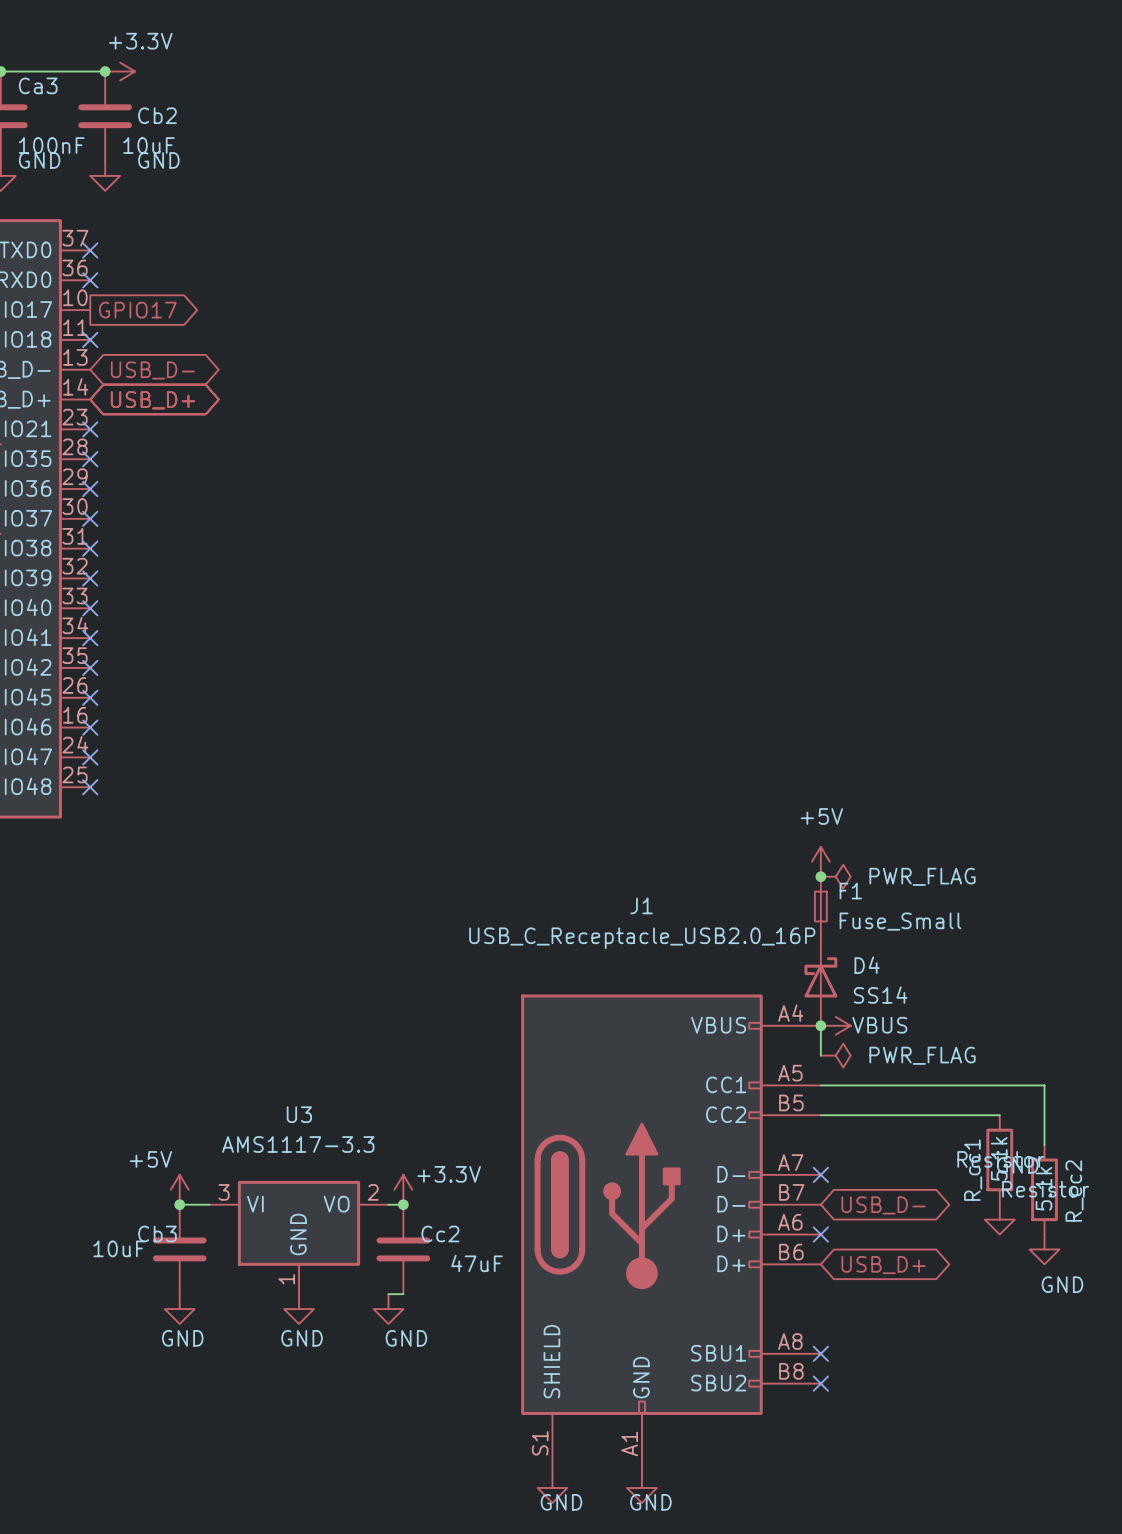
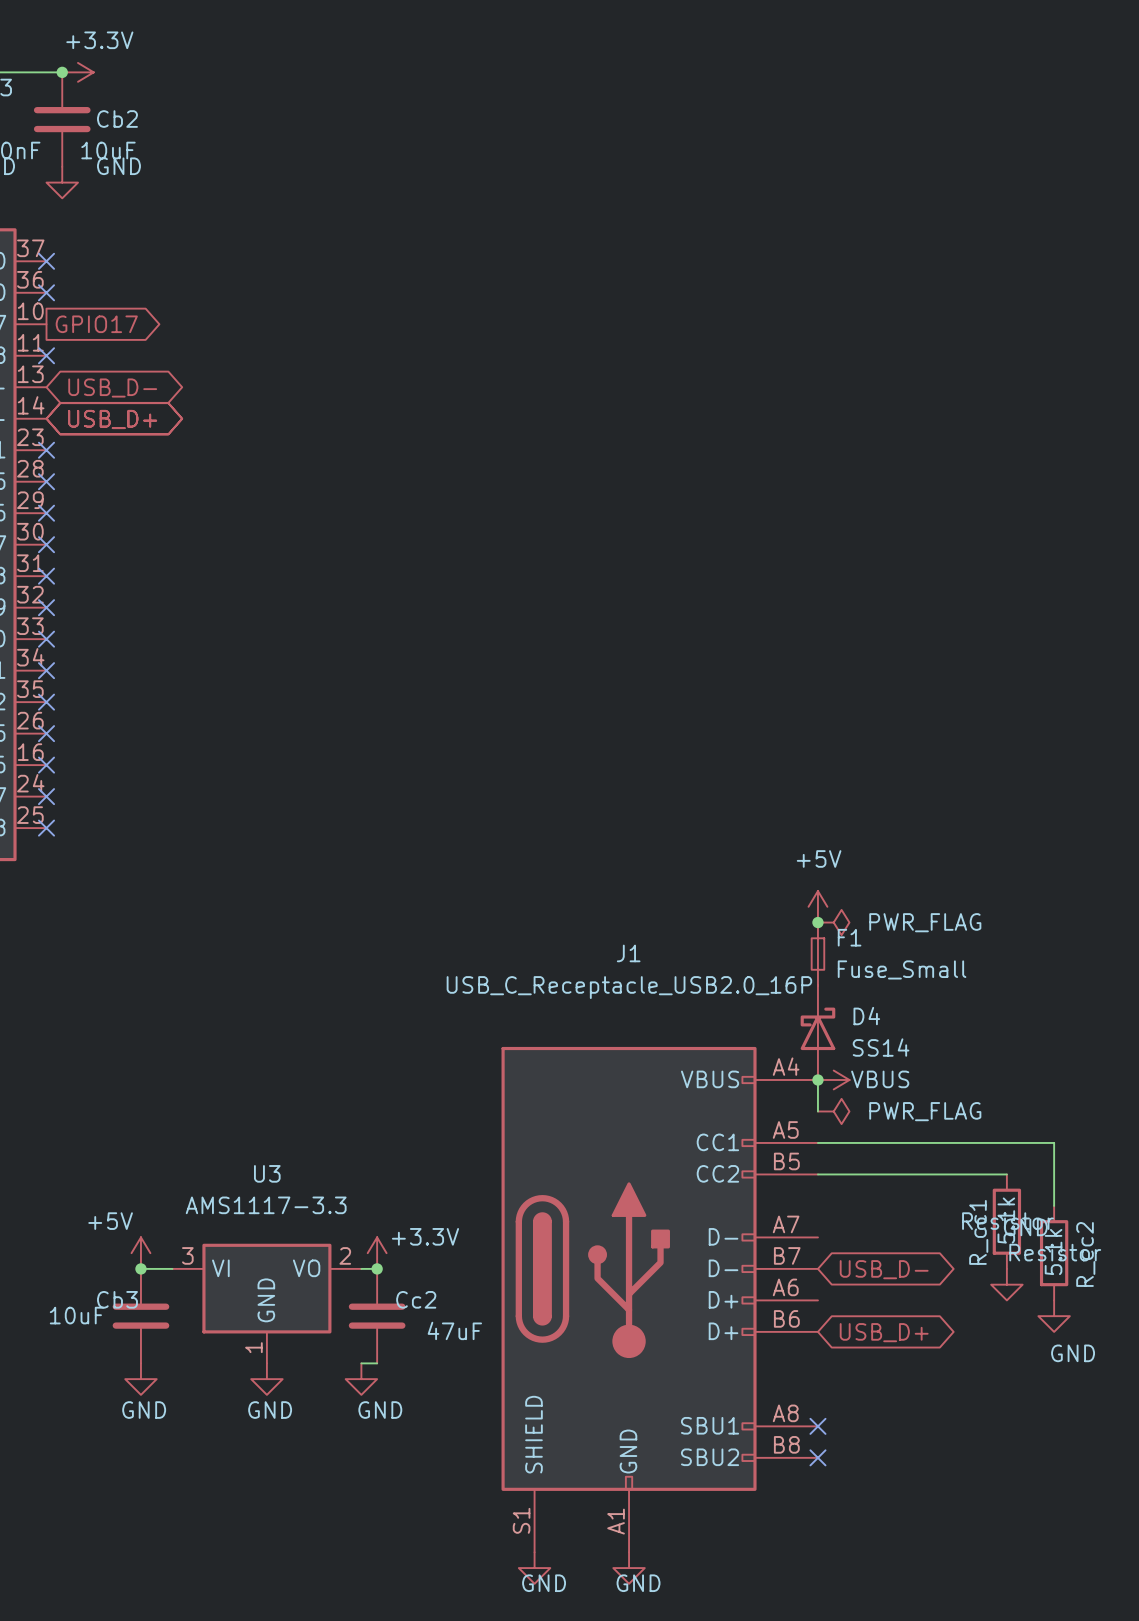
no-connect mark: (820, 1174) -> none
no-connect mark: (820, 1234) -> none

